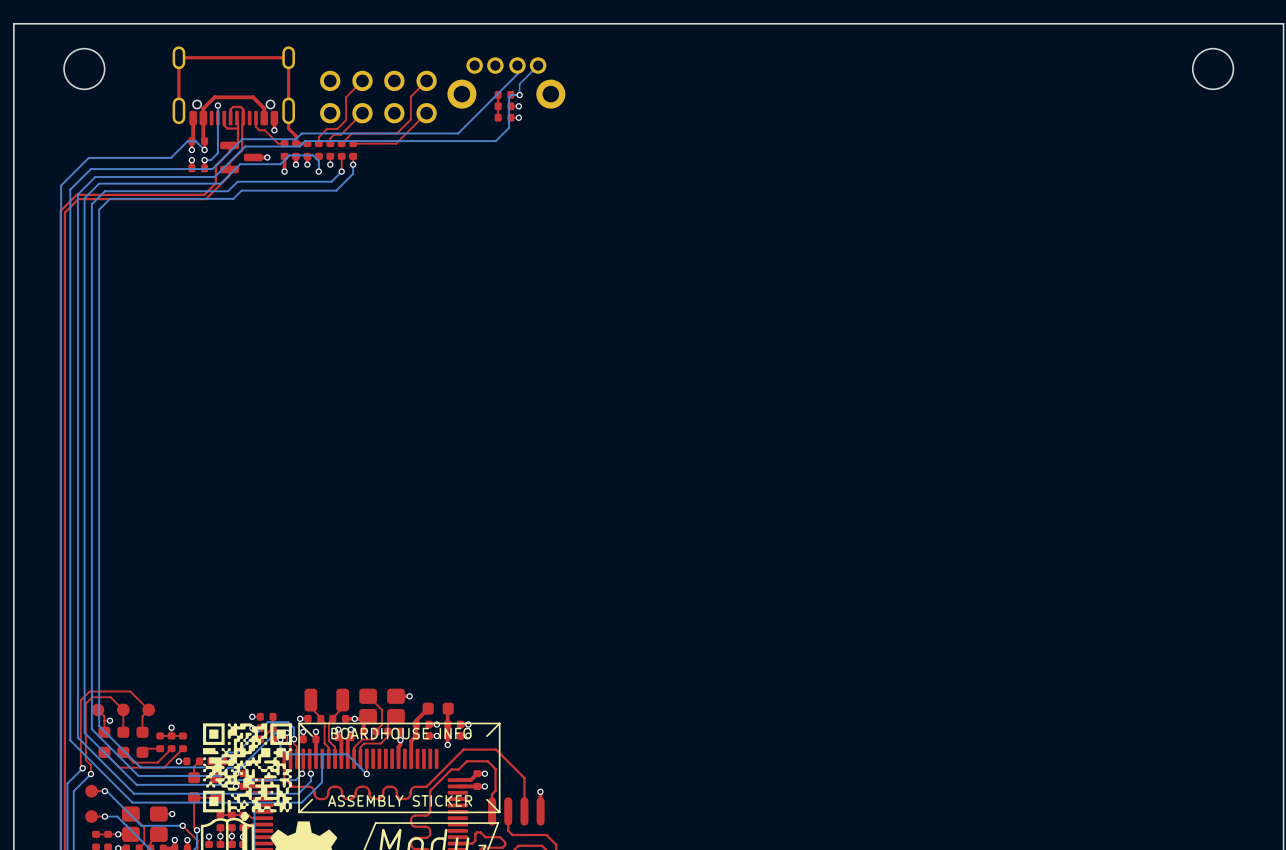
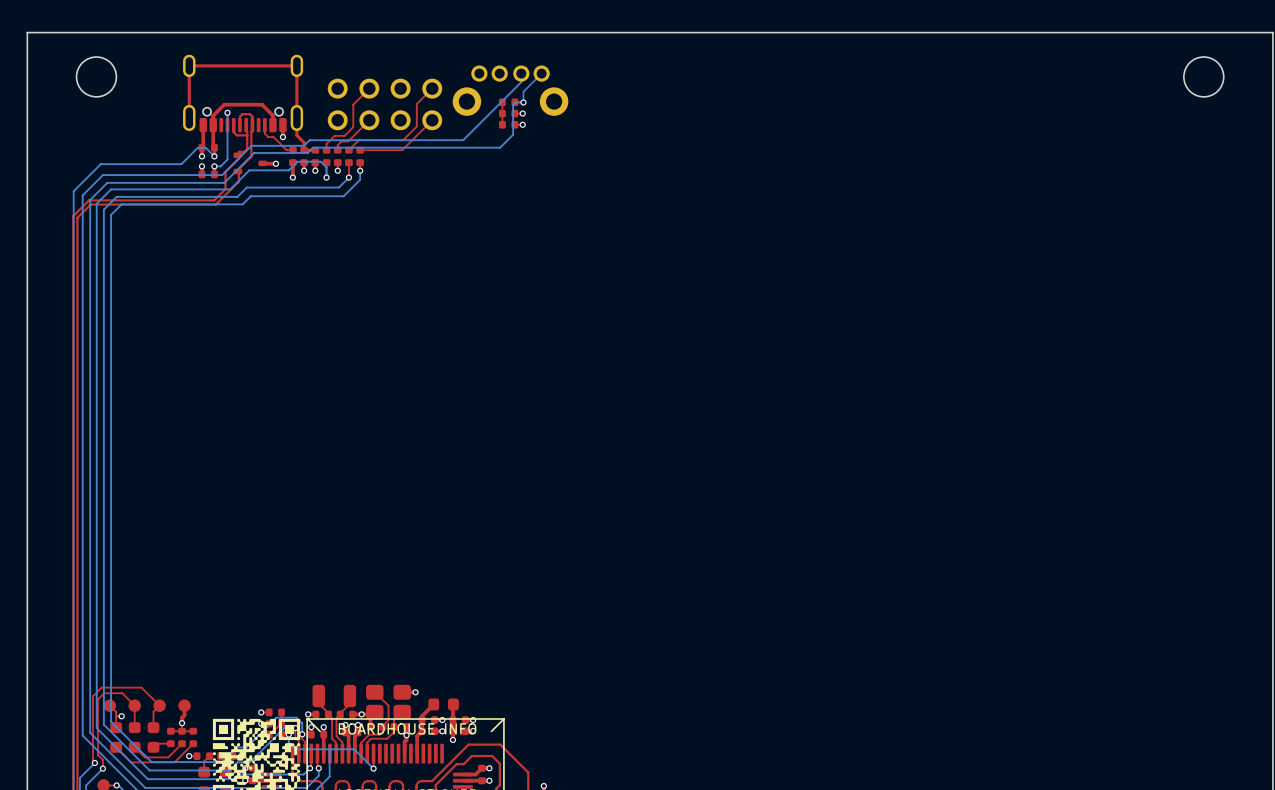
part footprint: [220, 141, 263, 174] -> [233, 152, 268, 175]
top track: none -> (184, 705) (182, 723)
part: none -> (184, 705)

